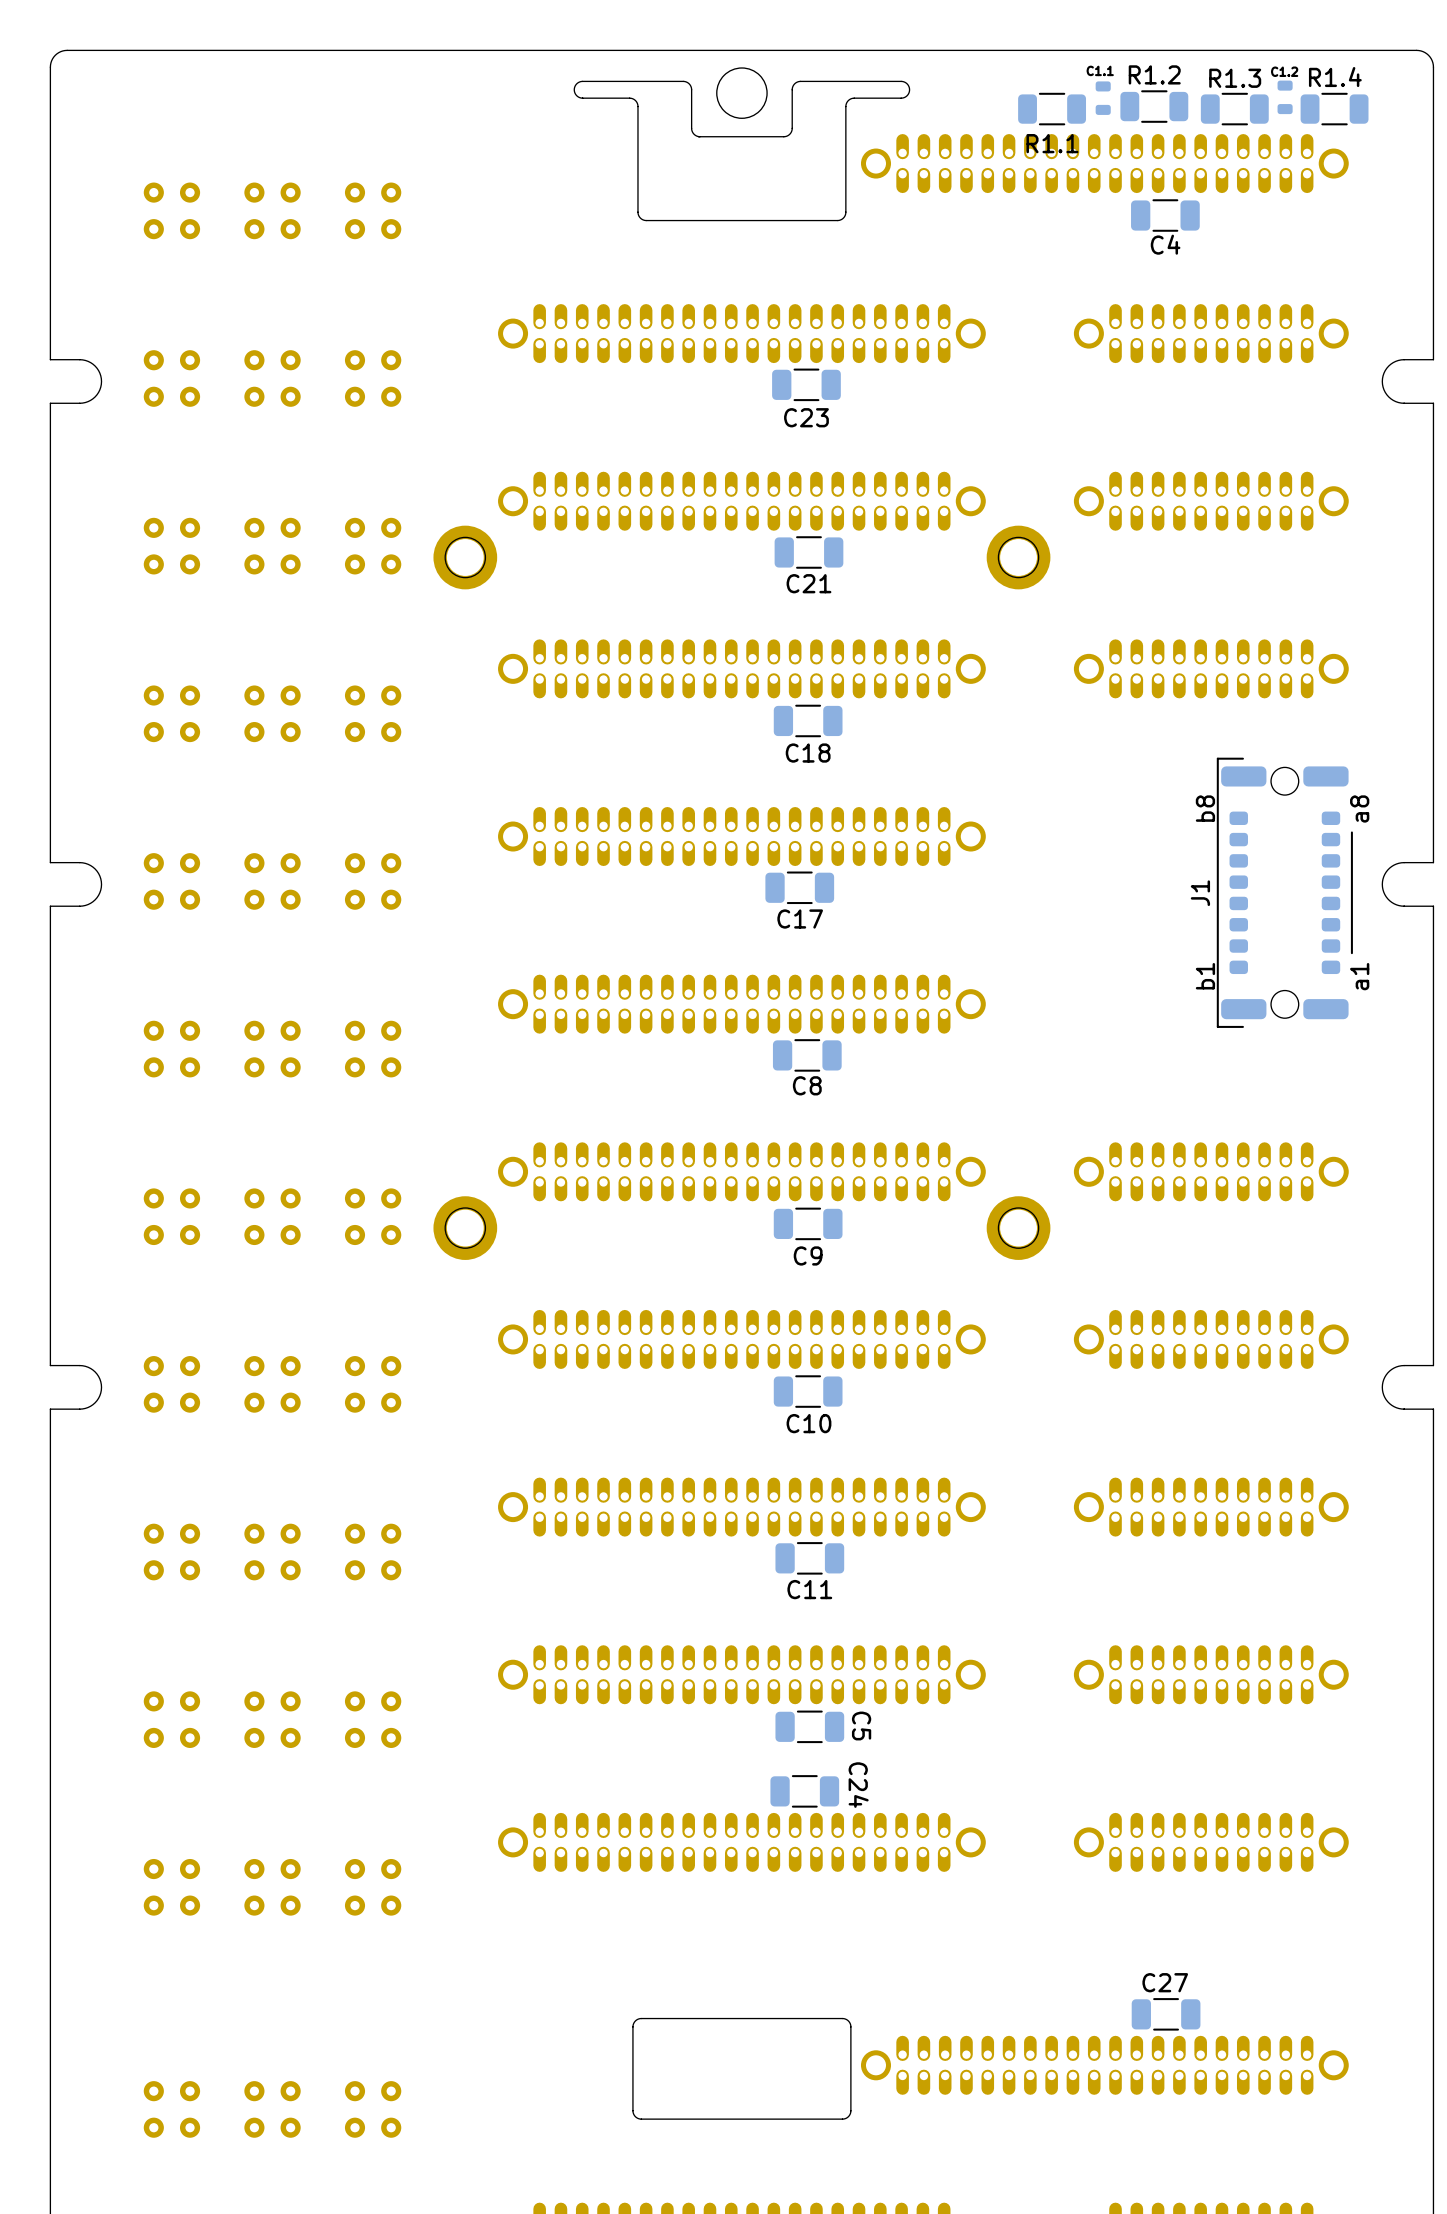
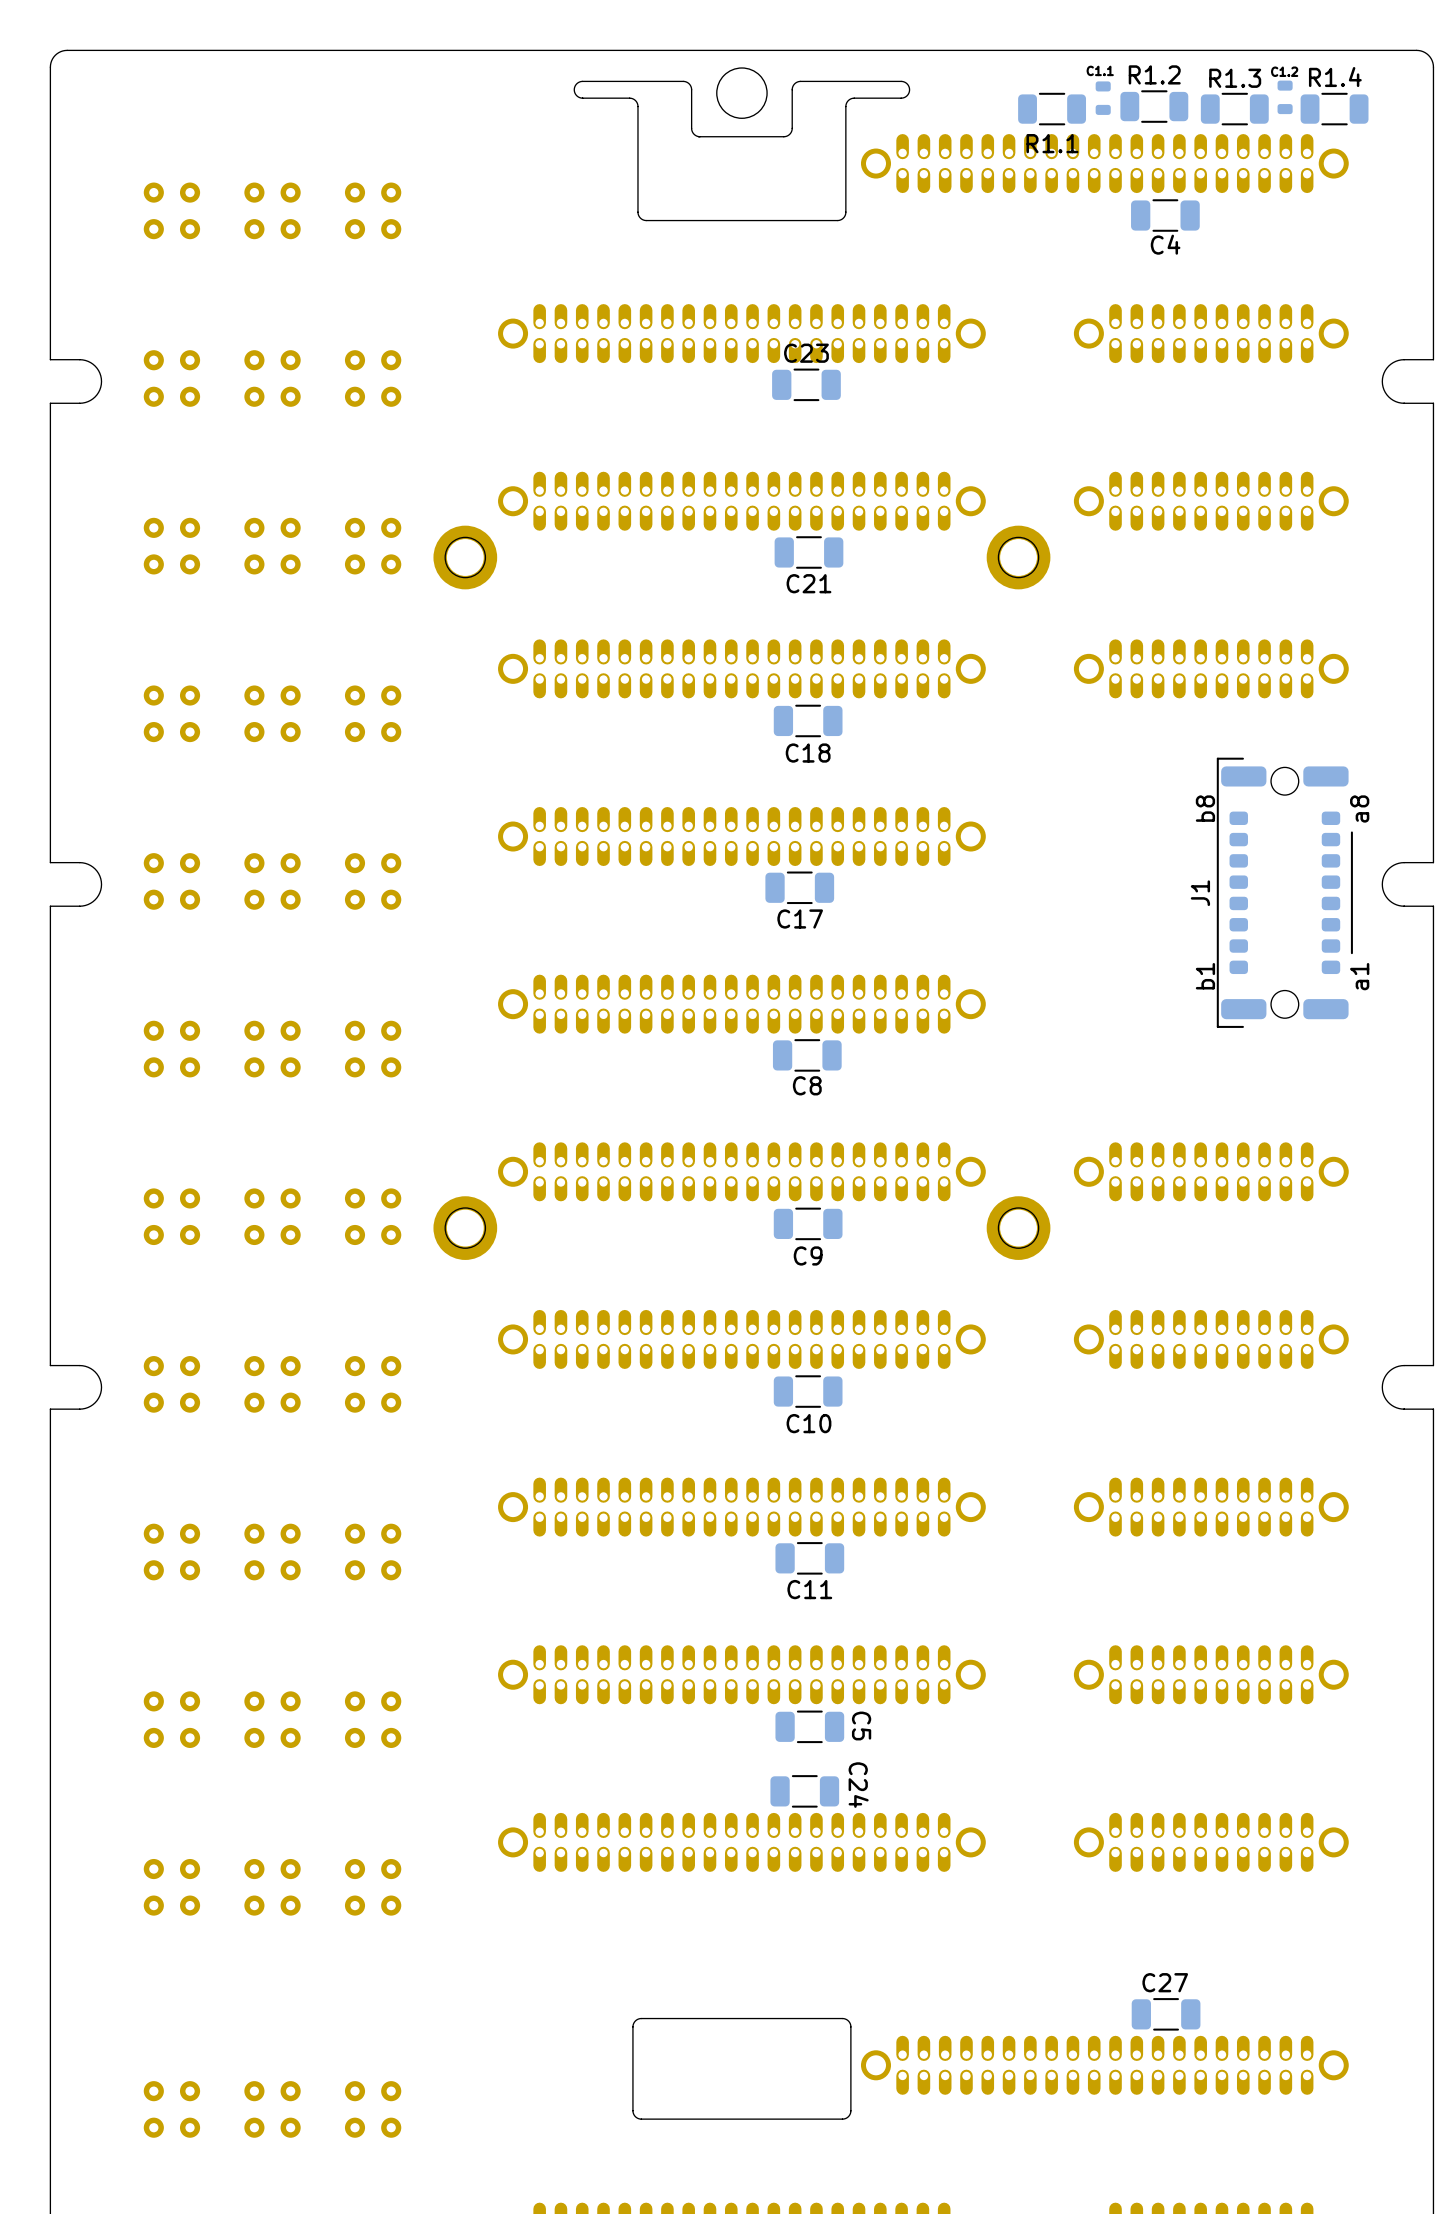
C23 name position: C23 (806, 417) -> C23 (806, 353)

